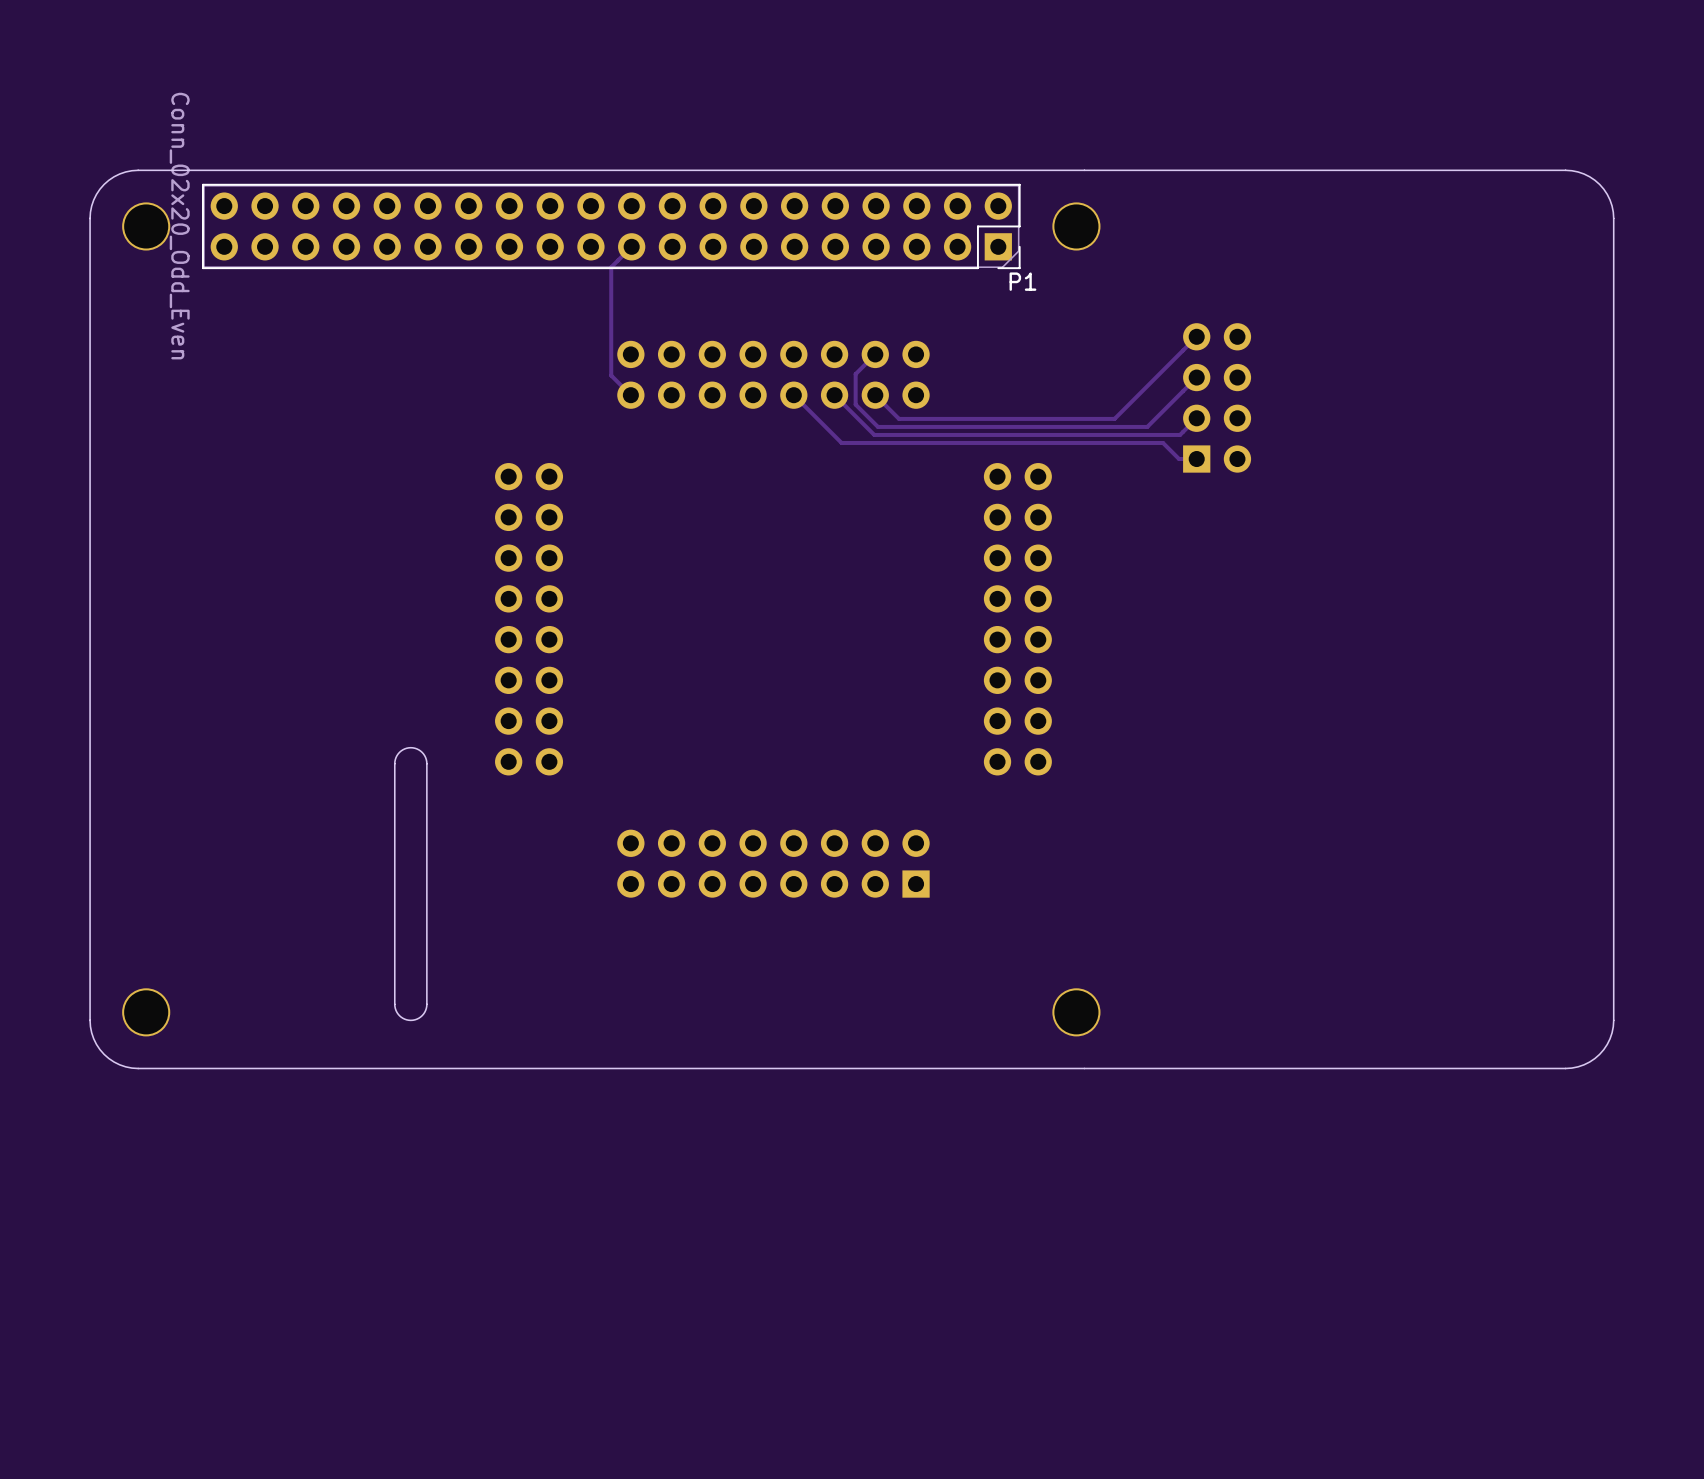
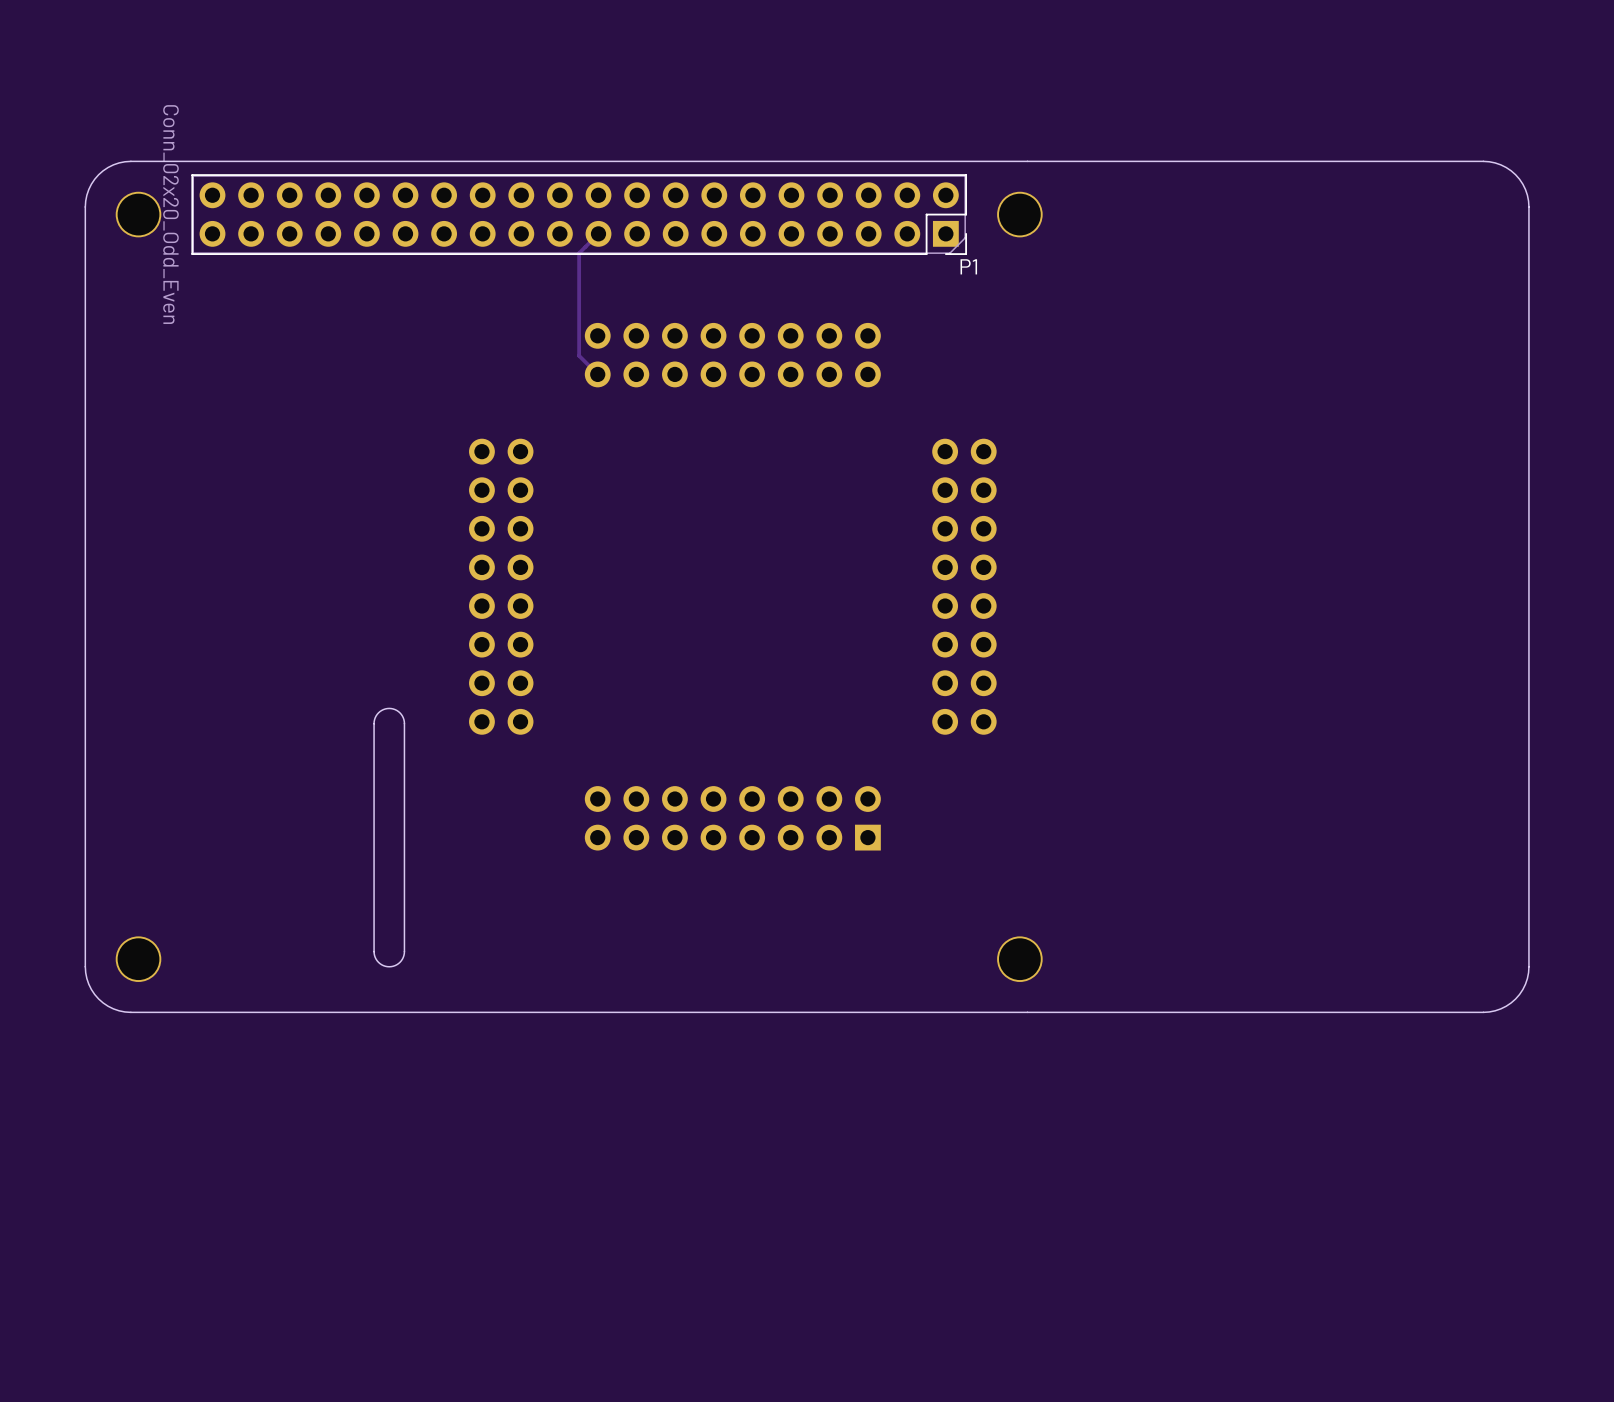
track: (1196, 336) (1114, 418) (899, 418) (875, 395) -> none
track: (875, 354) (855, 374) (855, 404) (877, 426) (1147, 426) (1196, 377) -> none
track: (793, 395) (841, 442) (1163, 442) (1179, 459) (1196, 459) -> none
track: (834, 395) (874, 434) (1180, 434) (1196, 418) -> none
part: (1217, 397) -> none

